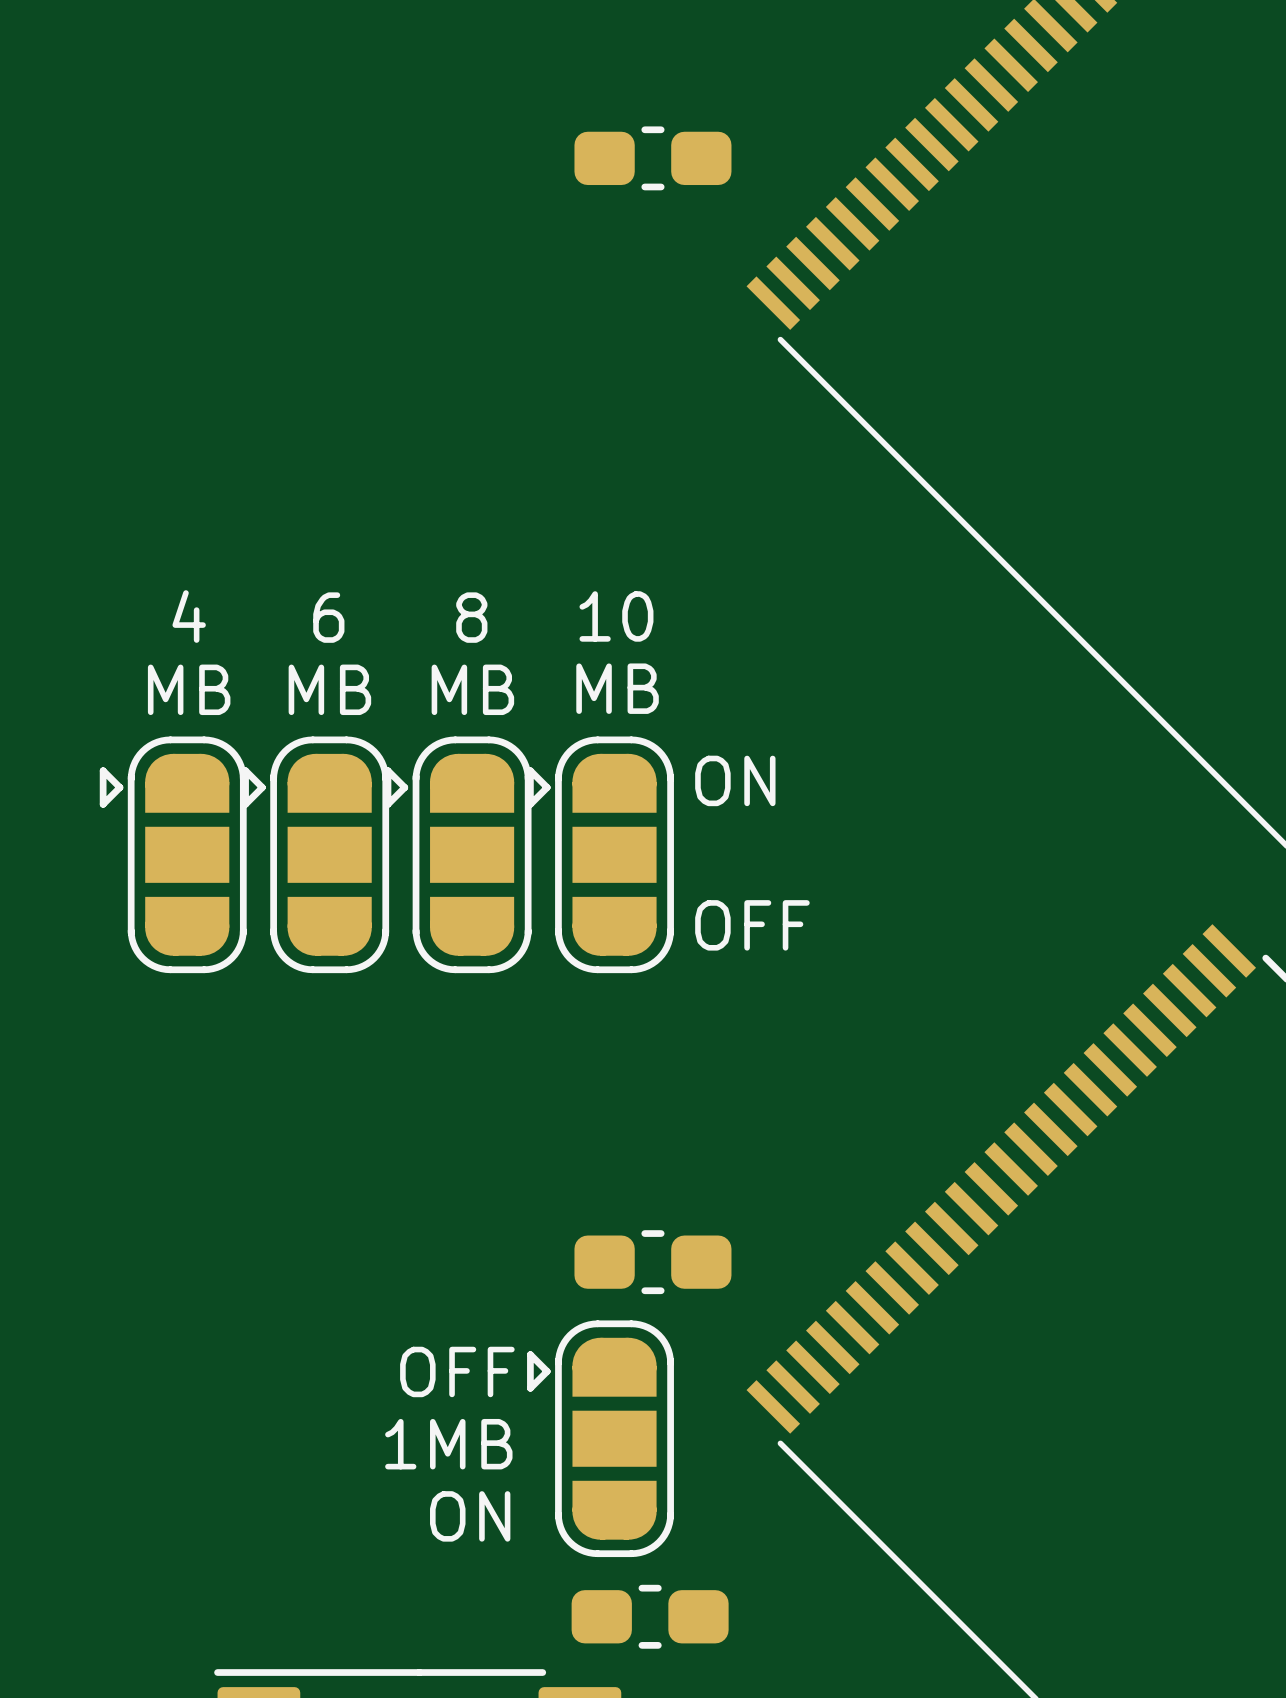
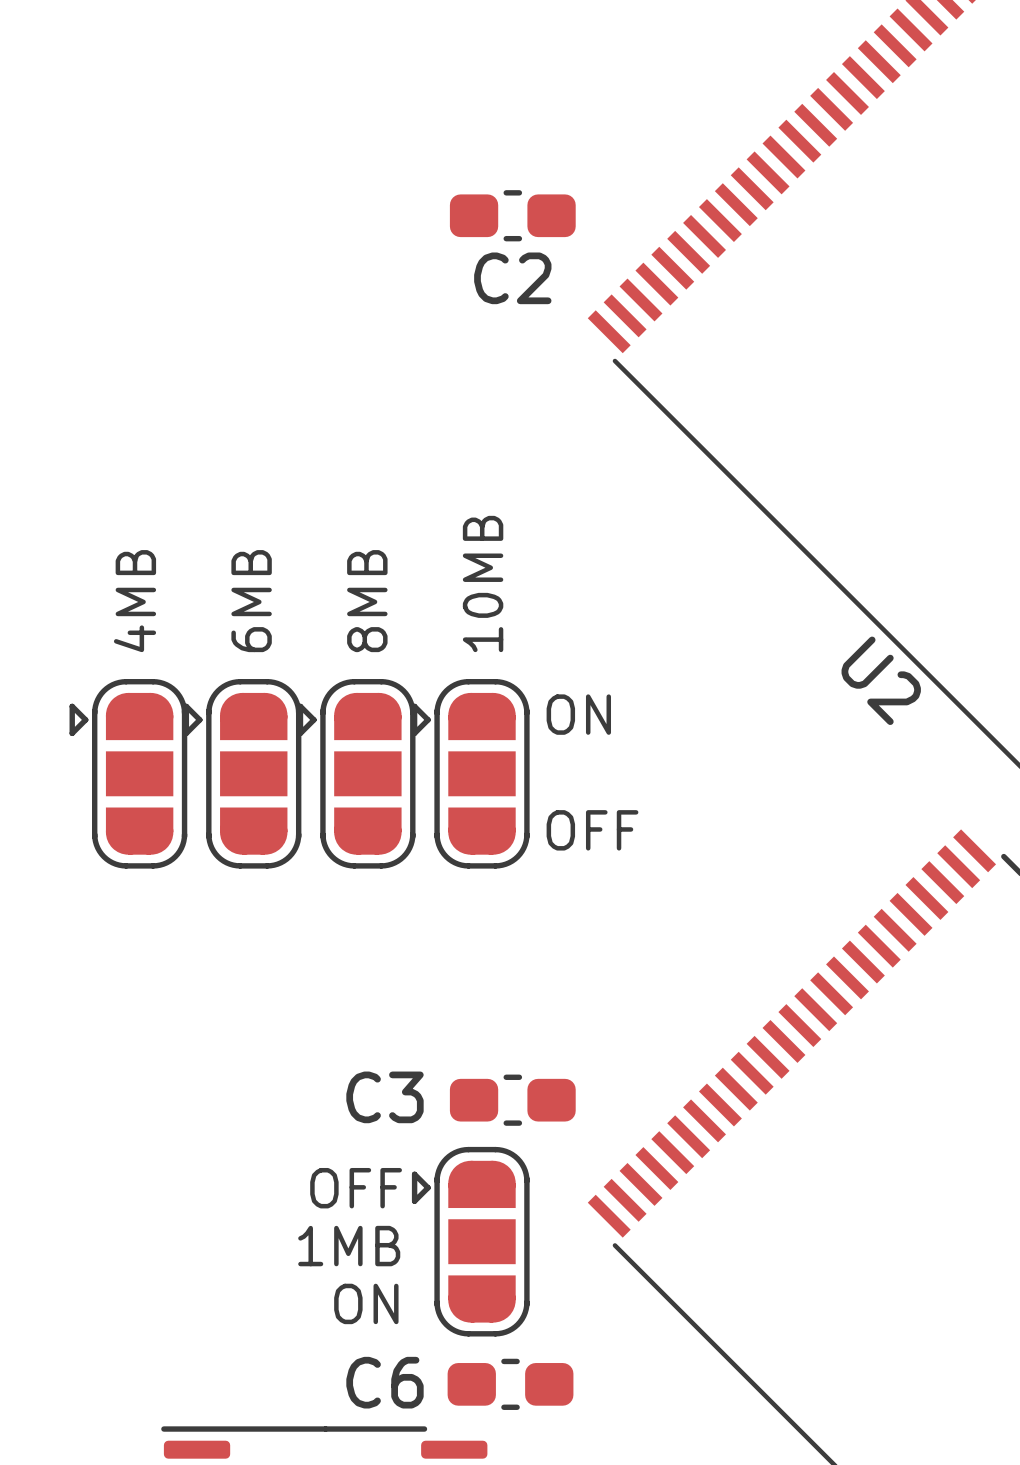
C2 name: none -> C2 (512, 278)
text: 4 (189, 616) -> none
text: 10 (616, 616) -> none
text: 6 (328, 617) -> none
text: 8 (471, 617) -> none
text: MB (617, 688) -> 10MB (483, 583)
text: MB (189, 689) -> 4MB (135, 601)
text: MB (329, 689) -> 6MB (251, 601)
text: MB (472, 689) -> 8MB (367, 601)
U2 name: none -> U2 (881, 680)
C3 name: none -> C3 (384, 1097)
C6 name: none -> C6 (384, 1382)

